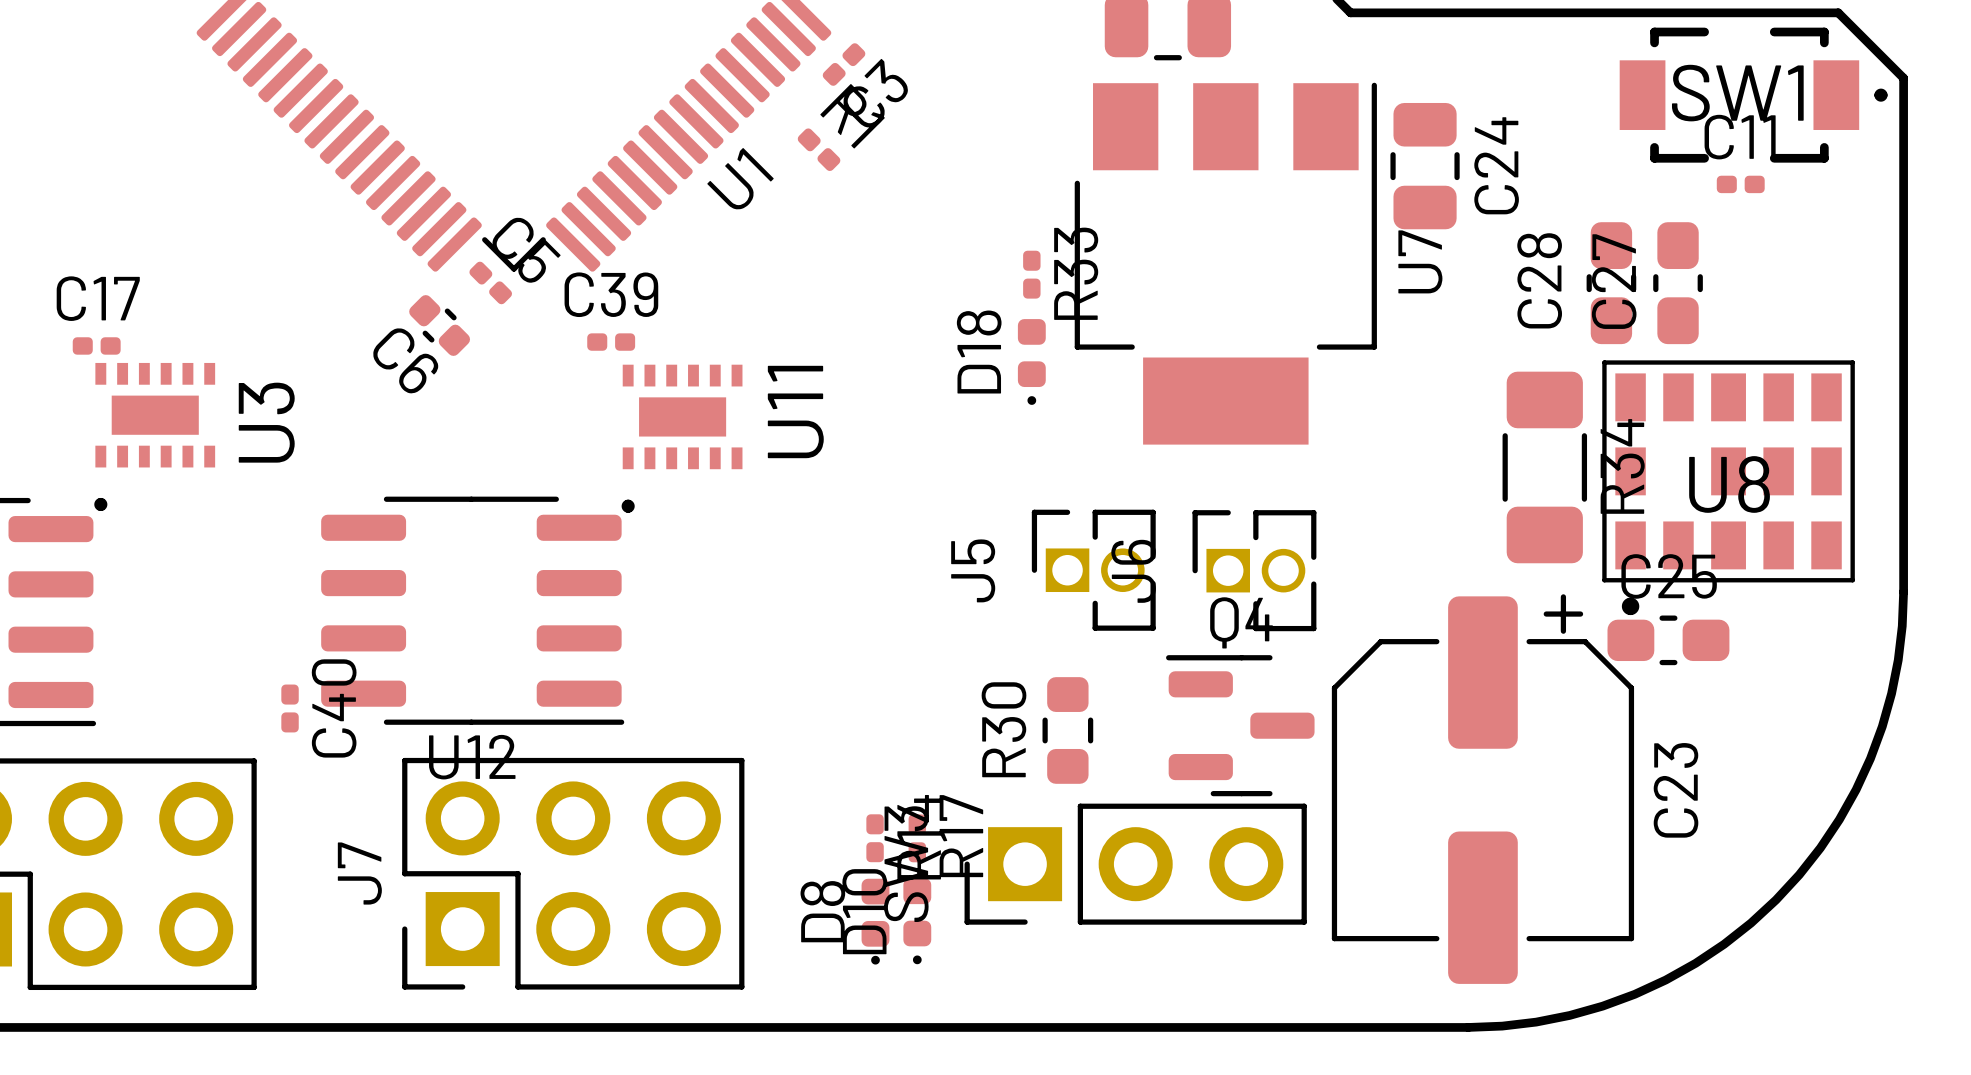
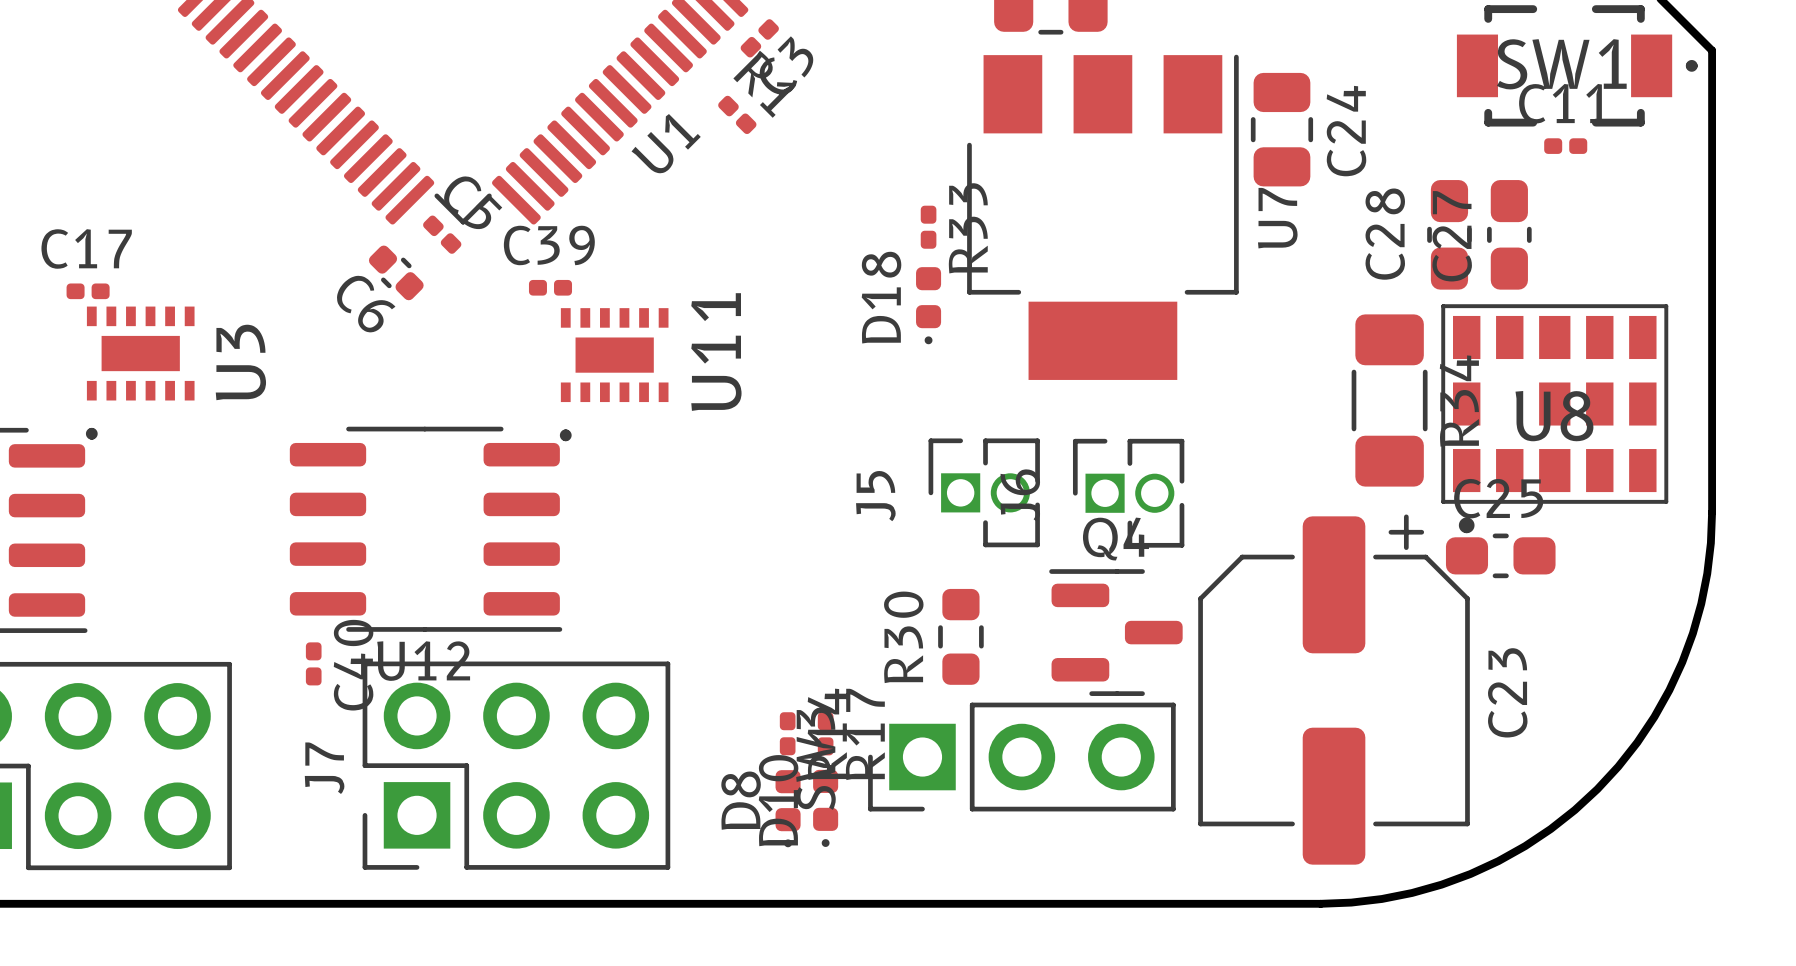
C40 position: (290, 708) -> (313, 663)

